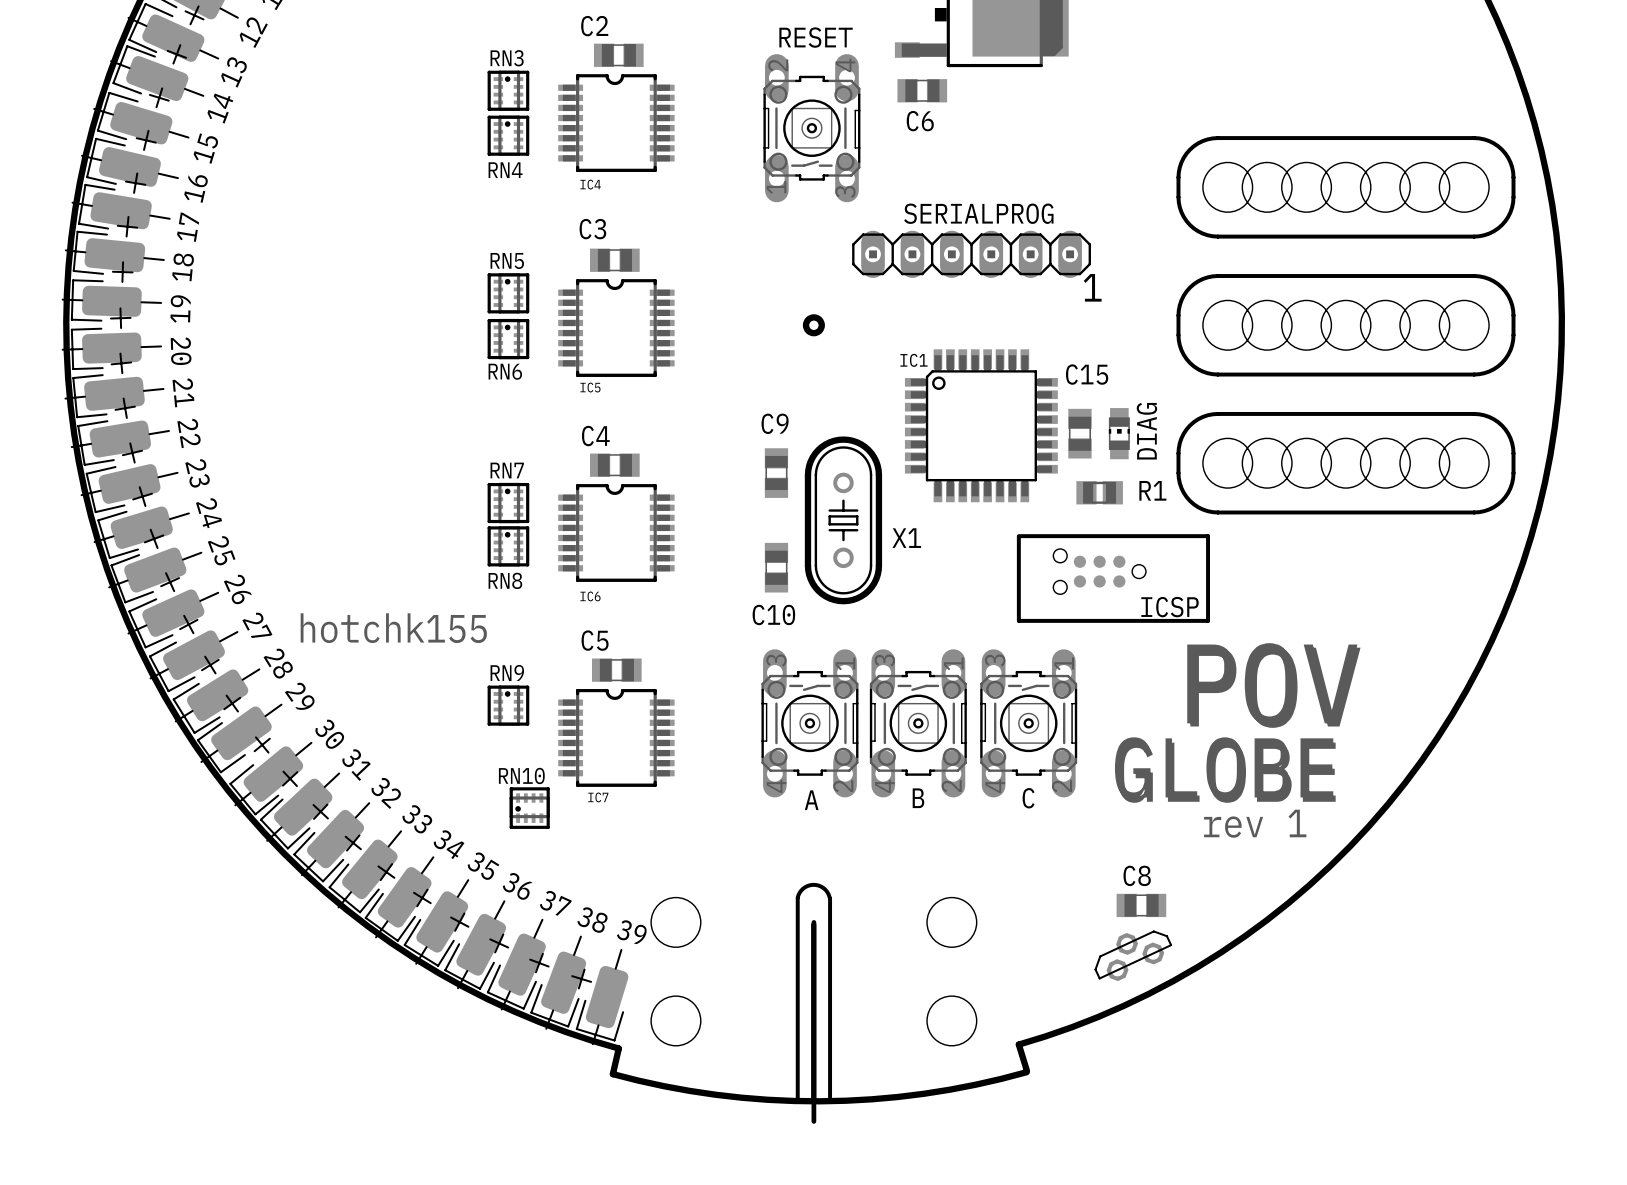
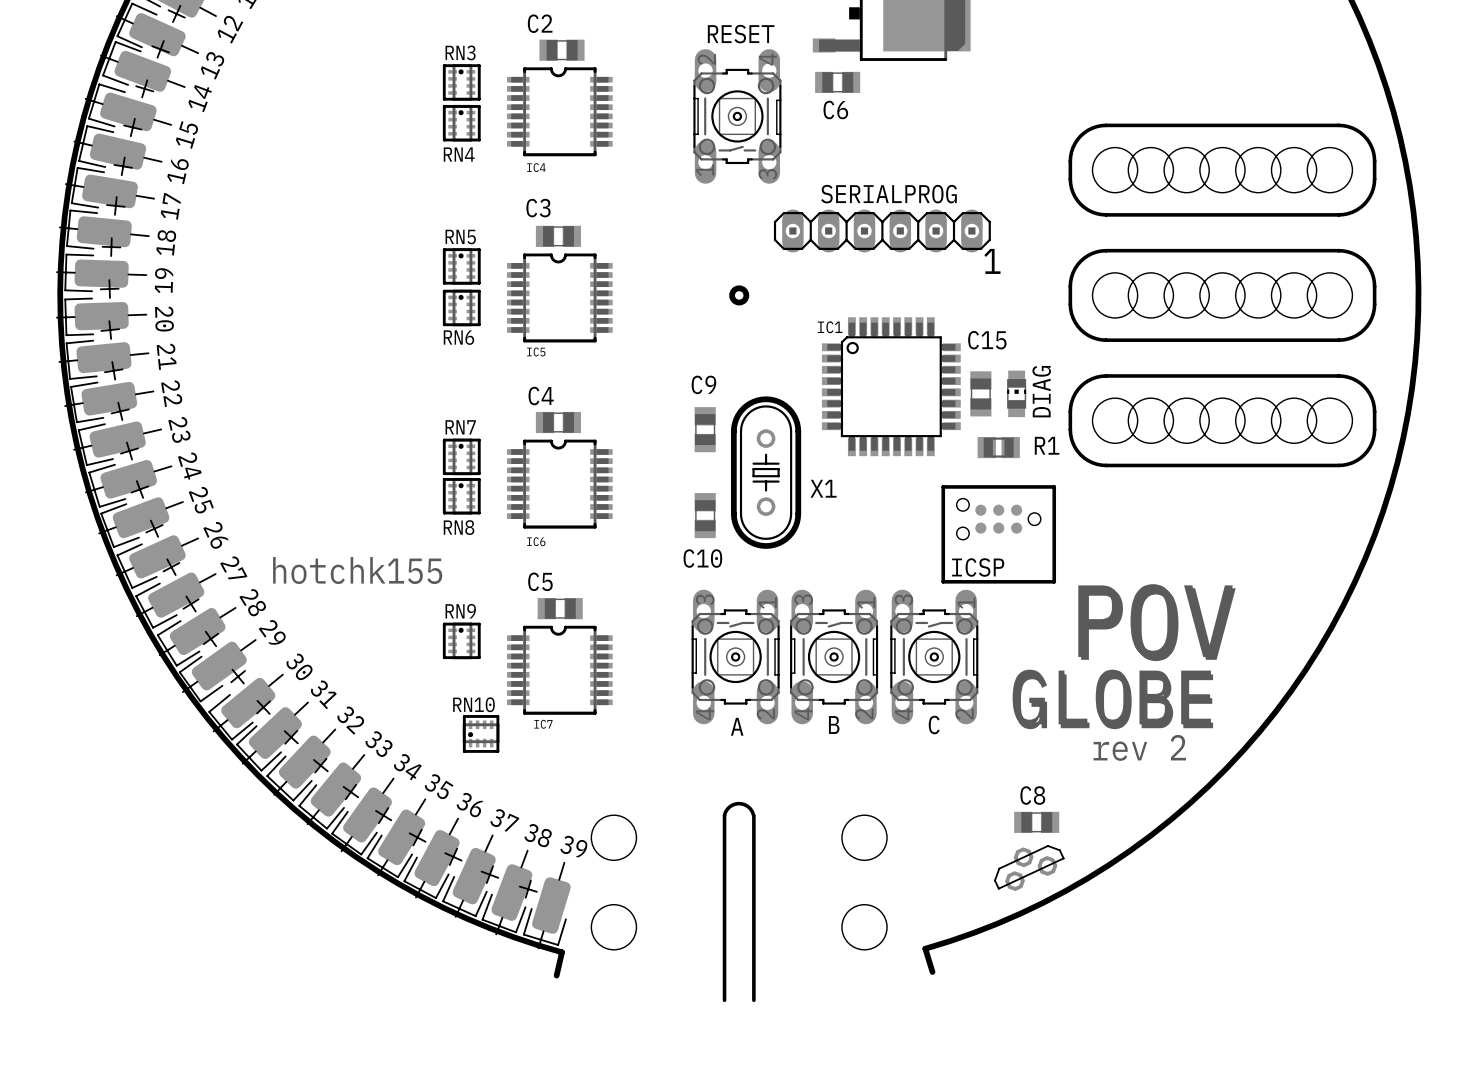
line: (1018, 536) (1018, 620) (1208, 620) (1208, 536) (1160, 536) -> (943, 486) (943, 581) (1054, 581) (1054, 486)
line: (1020, 536) (1038, 536) -> none
ICSP name position: ICSP (1170, 607) -> ICSP (978, 567)
text: rev 1 (1255, 823) -> rev 2 (1139, 747)
line: (813, 922) (813, 1121) -> none
board edge: (1026, 1072) (975, 1084) (924, 1093) (872, 1099) (819, 1101) (767, 1099) (715, 1094) (663, 1086) (612, 1074) -> none

